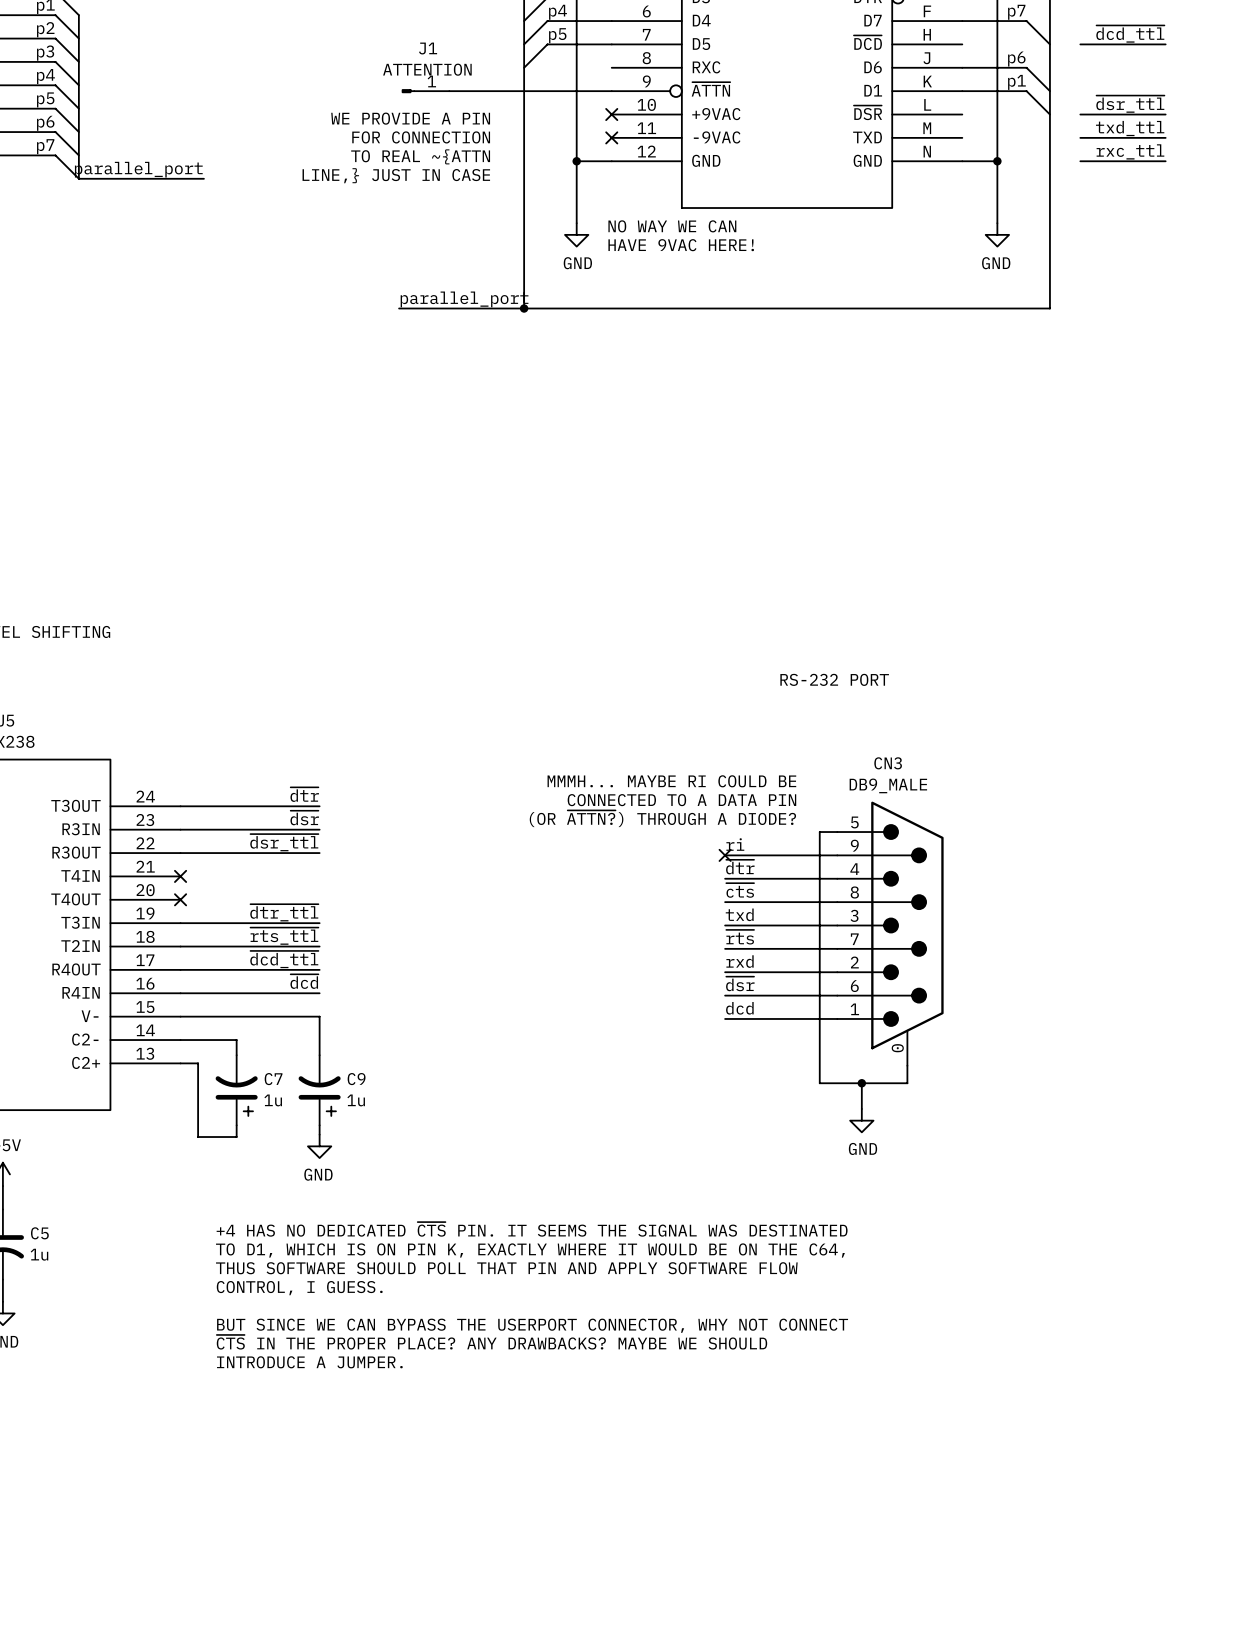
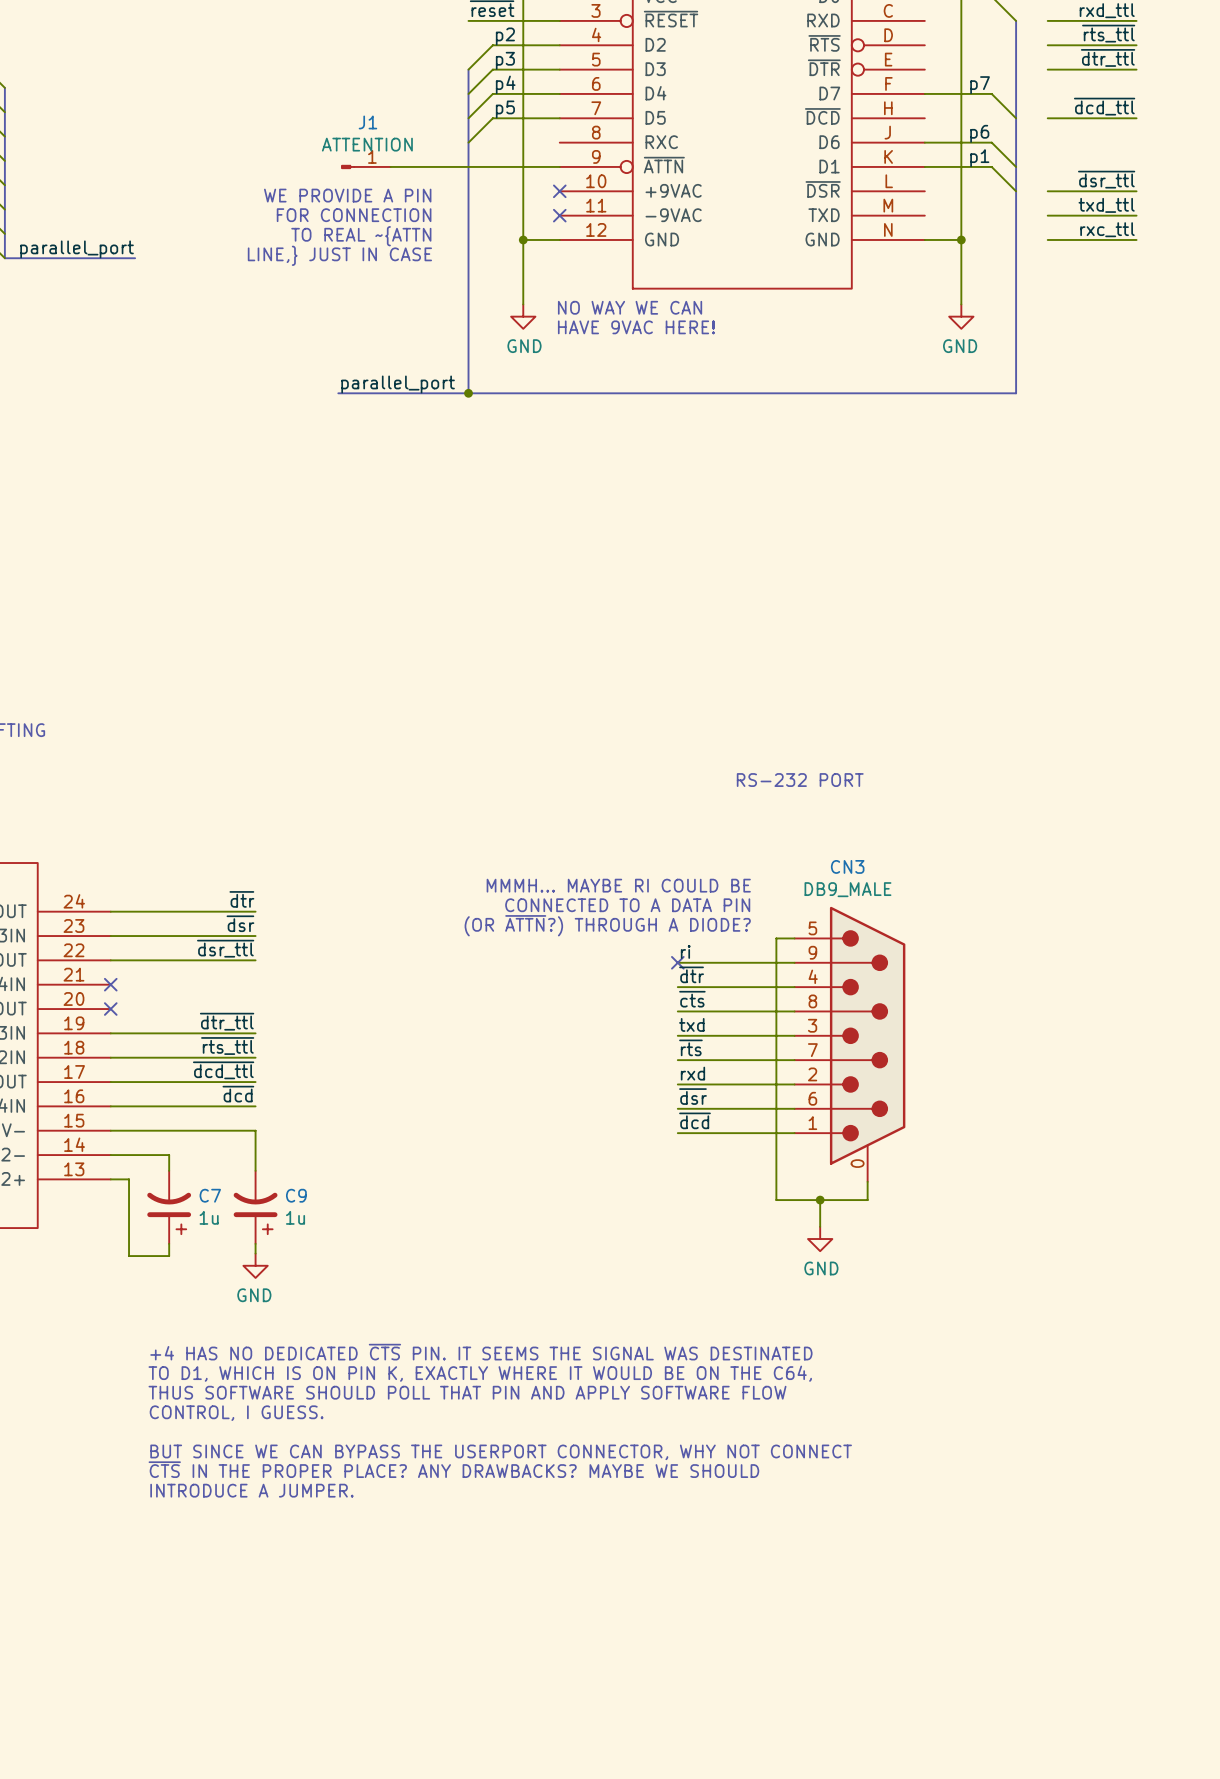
text: (OR ~{ATTN?}) THROUGH A DIODE? (662, 818) -> (OR ~{ATTN}?) THROUGH A DIODE? (607, 925)
label: dcd (739, 1008) -> ~{dcd} (694, 1120)

